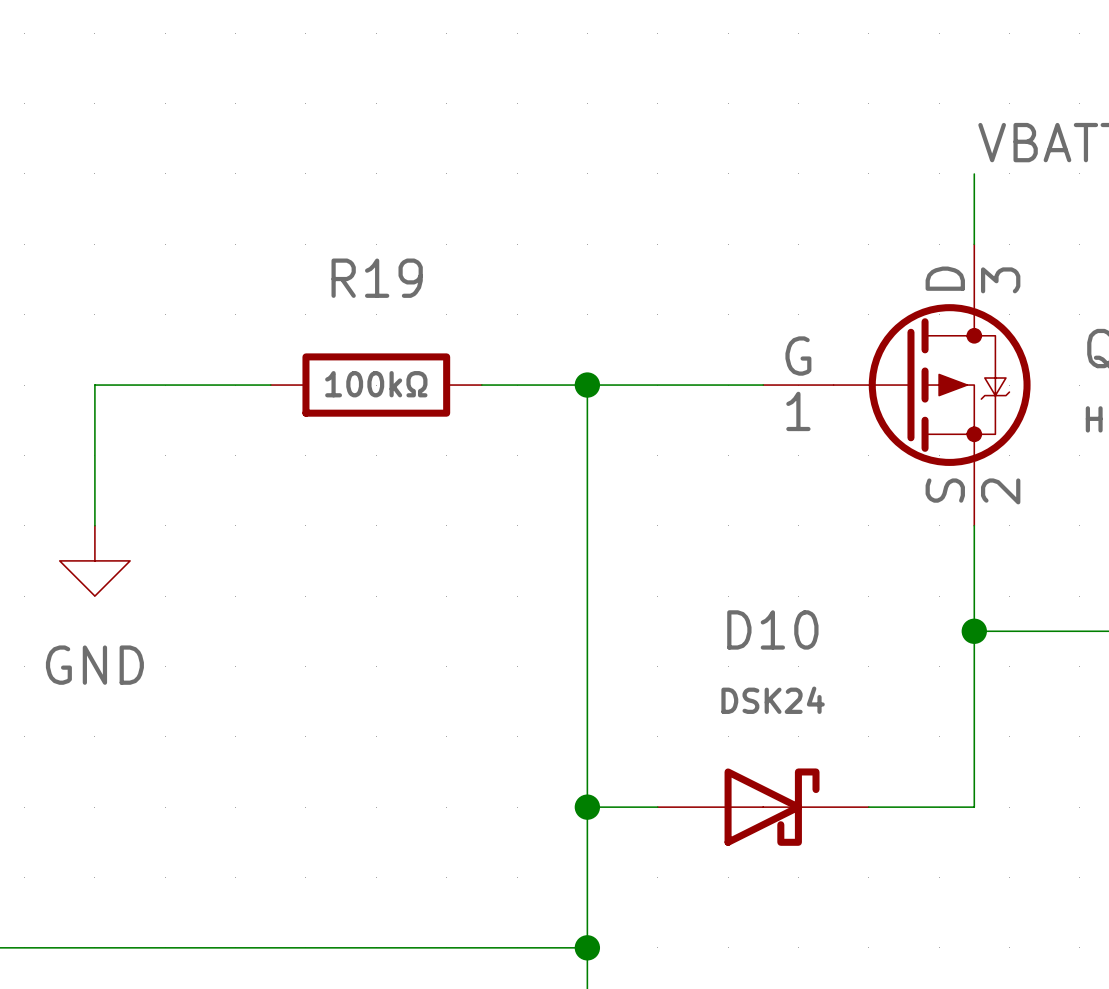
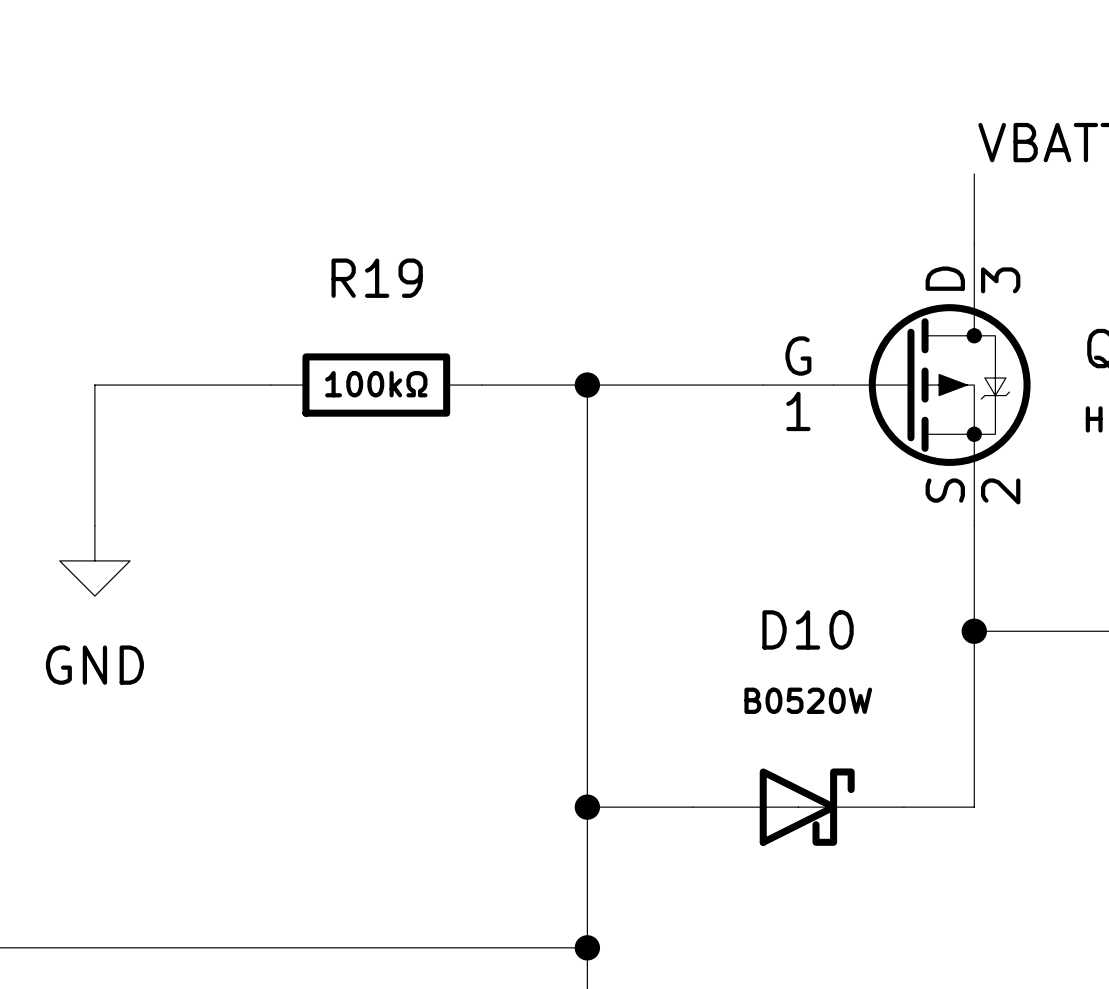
D10 value: DSK24 (773, 700) -> B0520W (808, 700)
D10 position: (763, 807) -> (798, 807)

